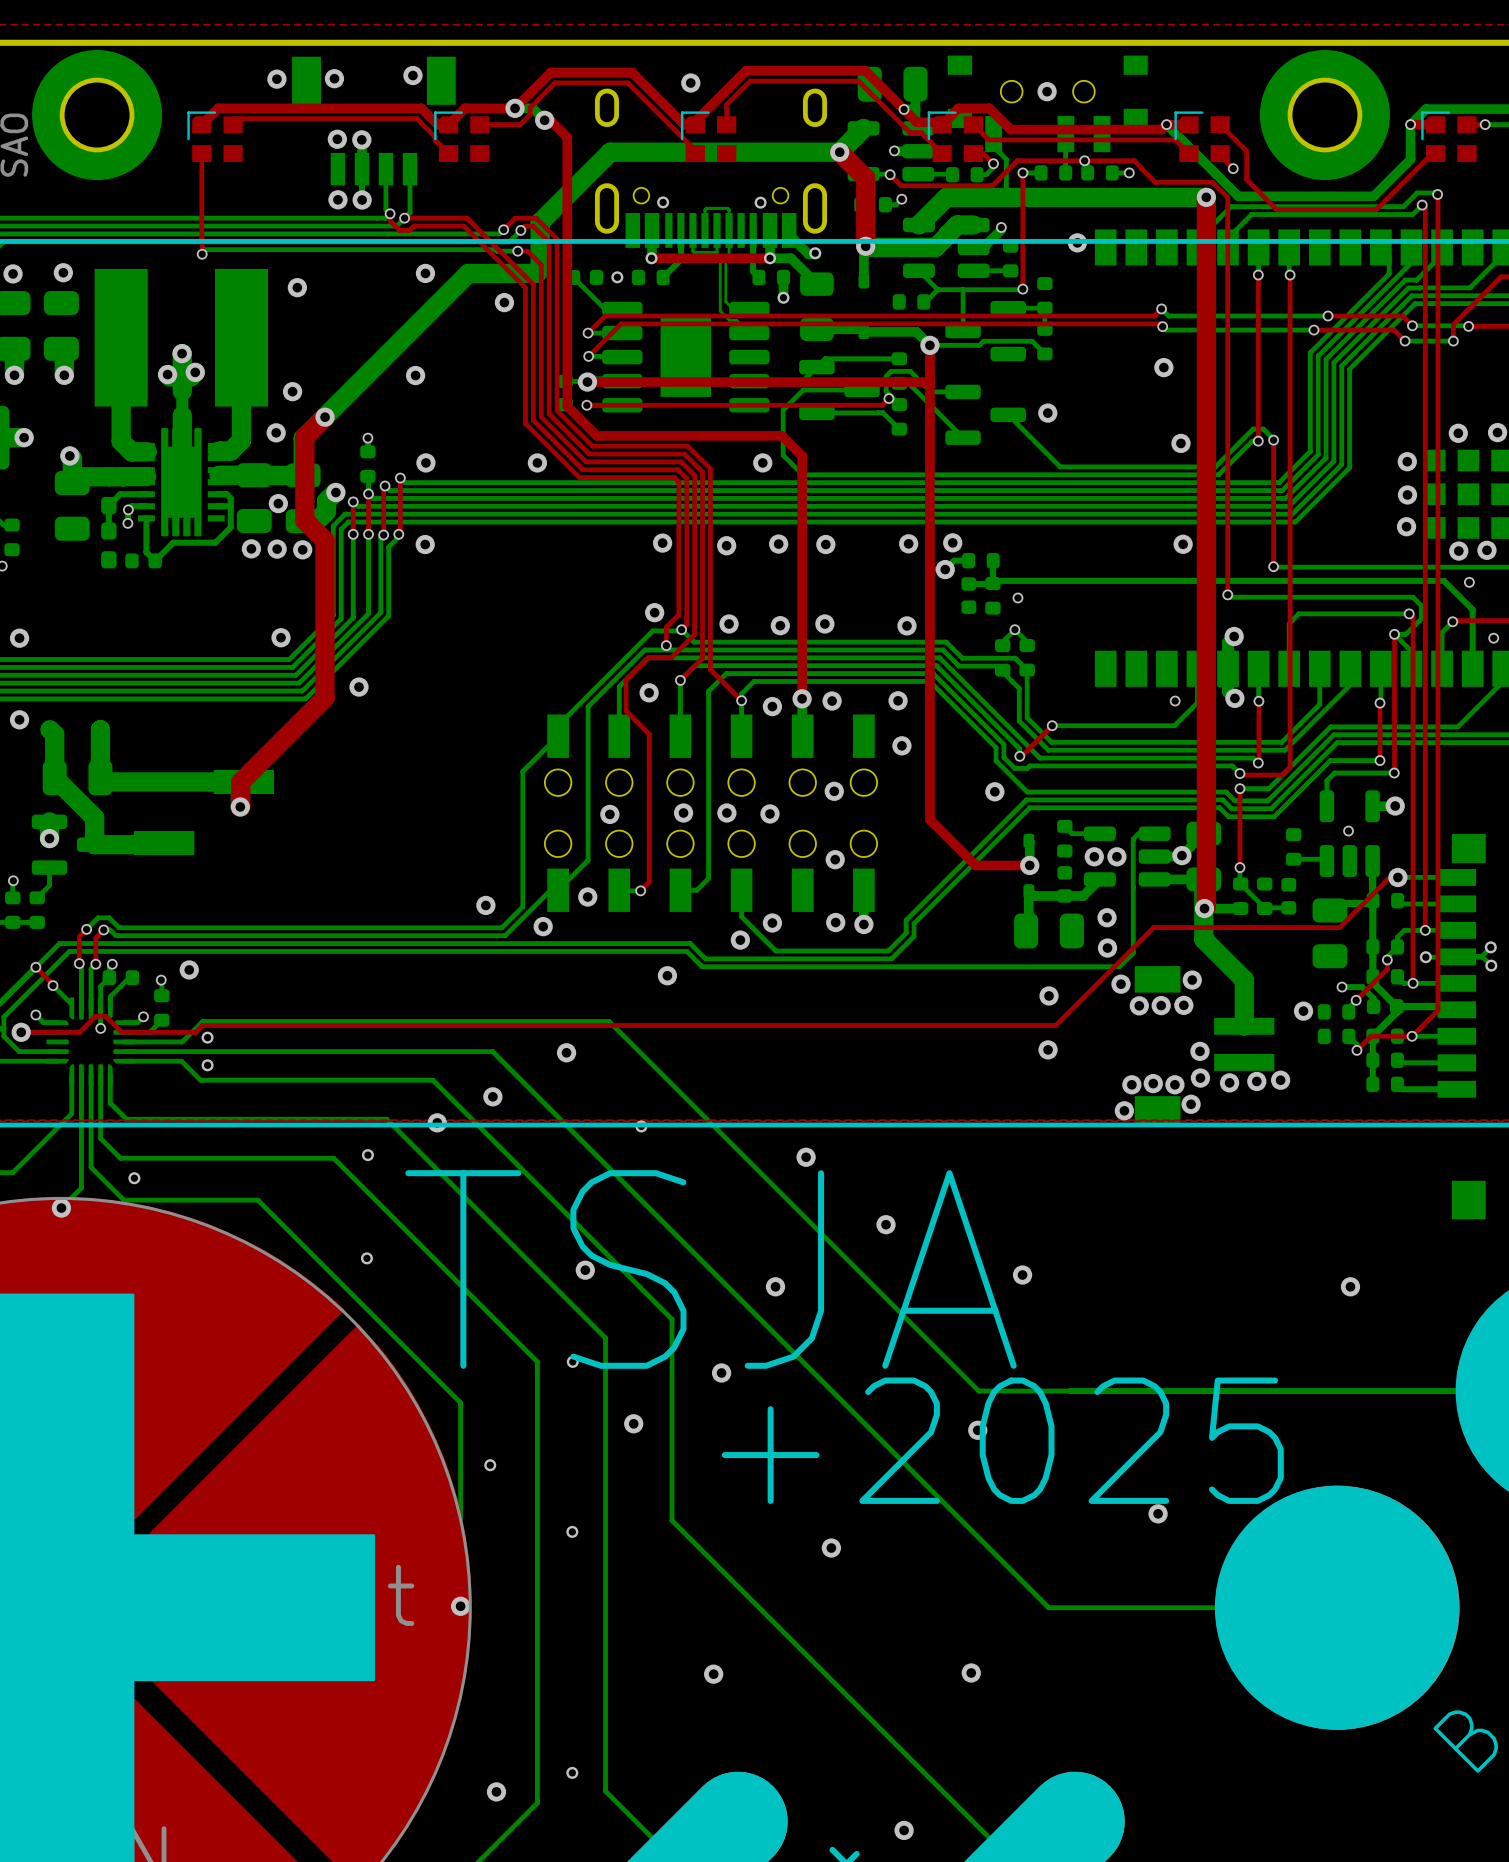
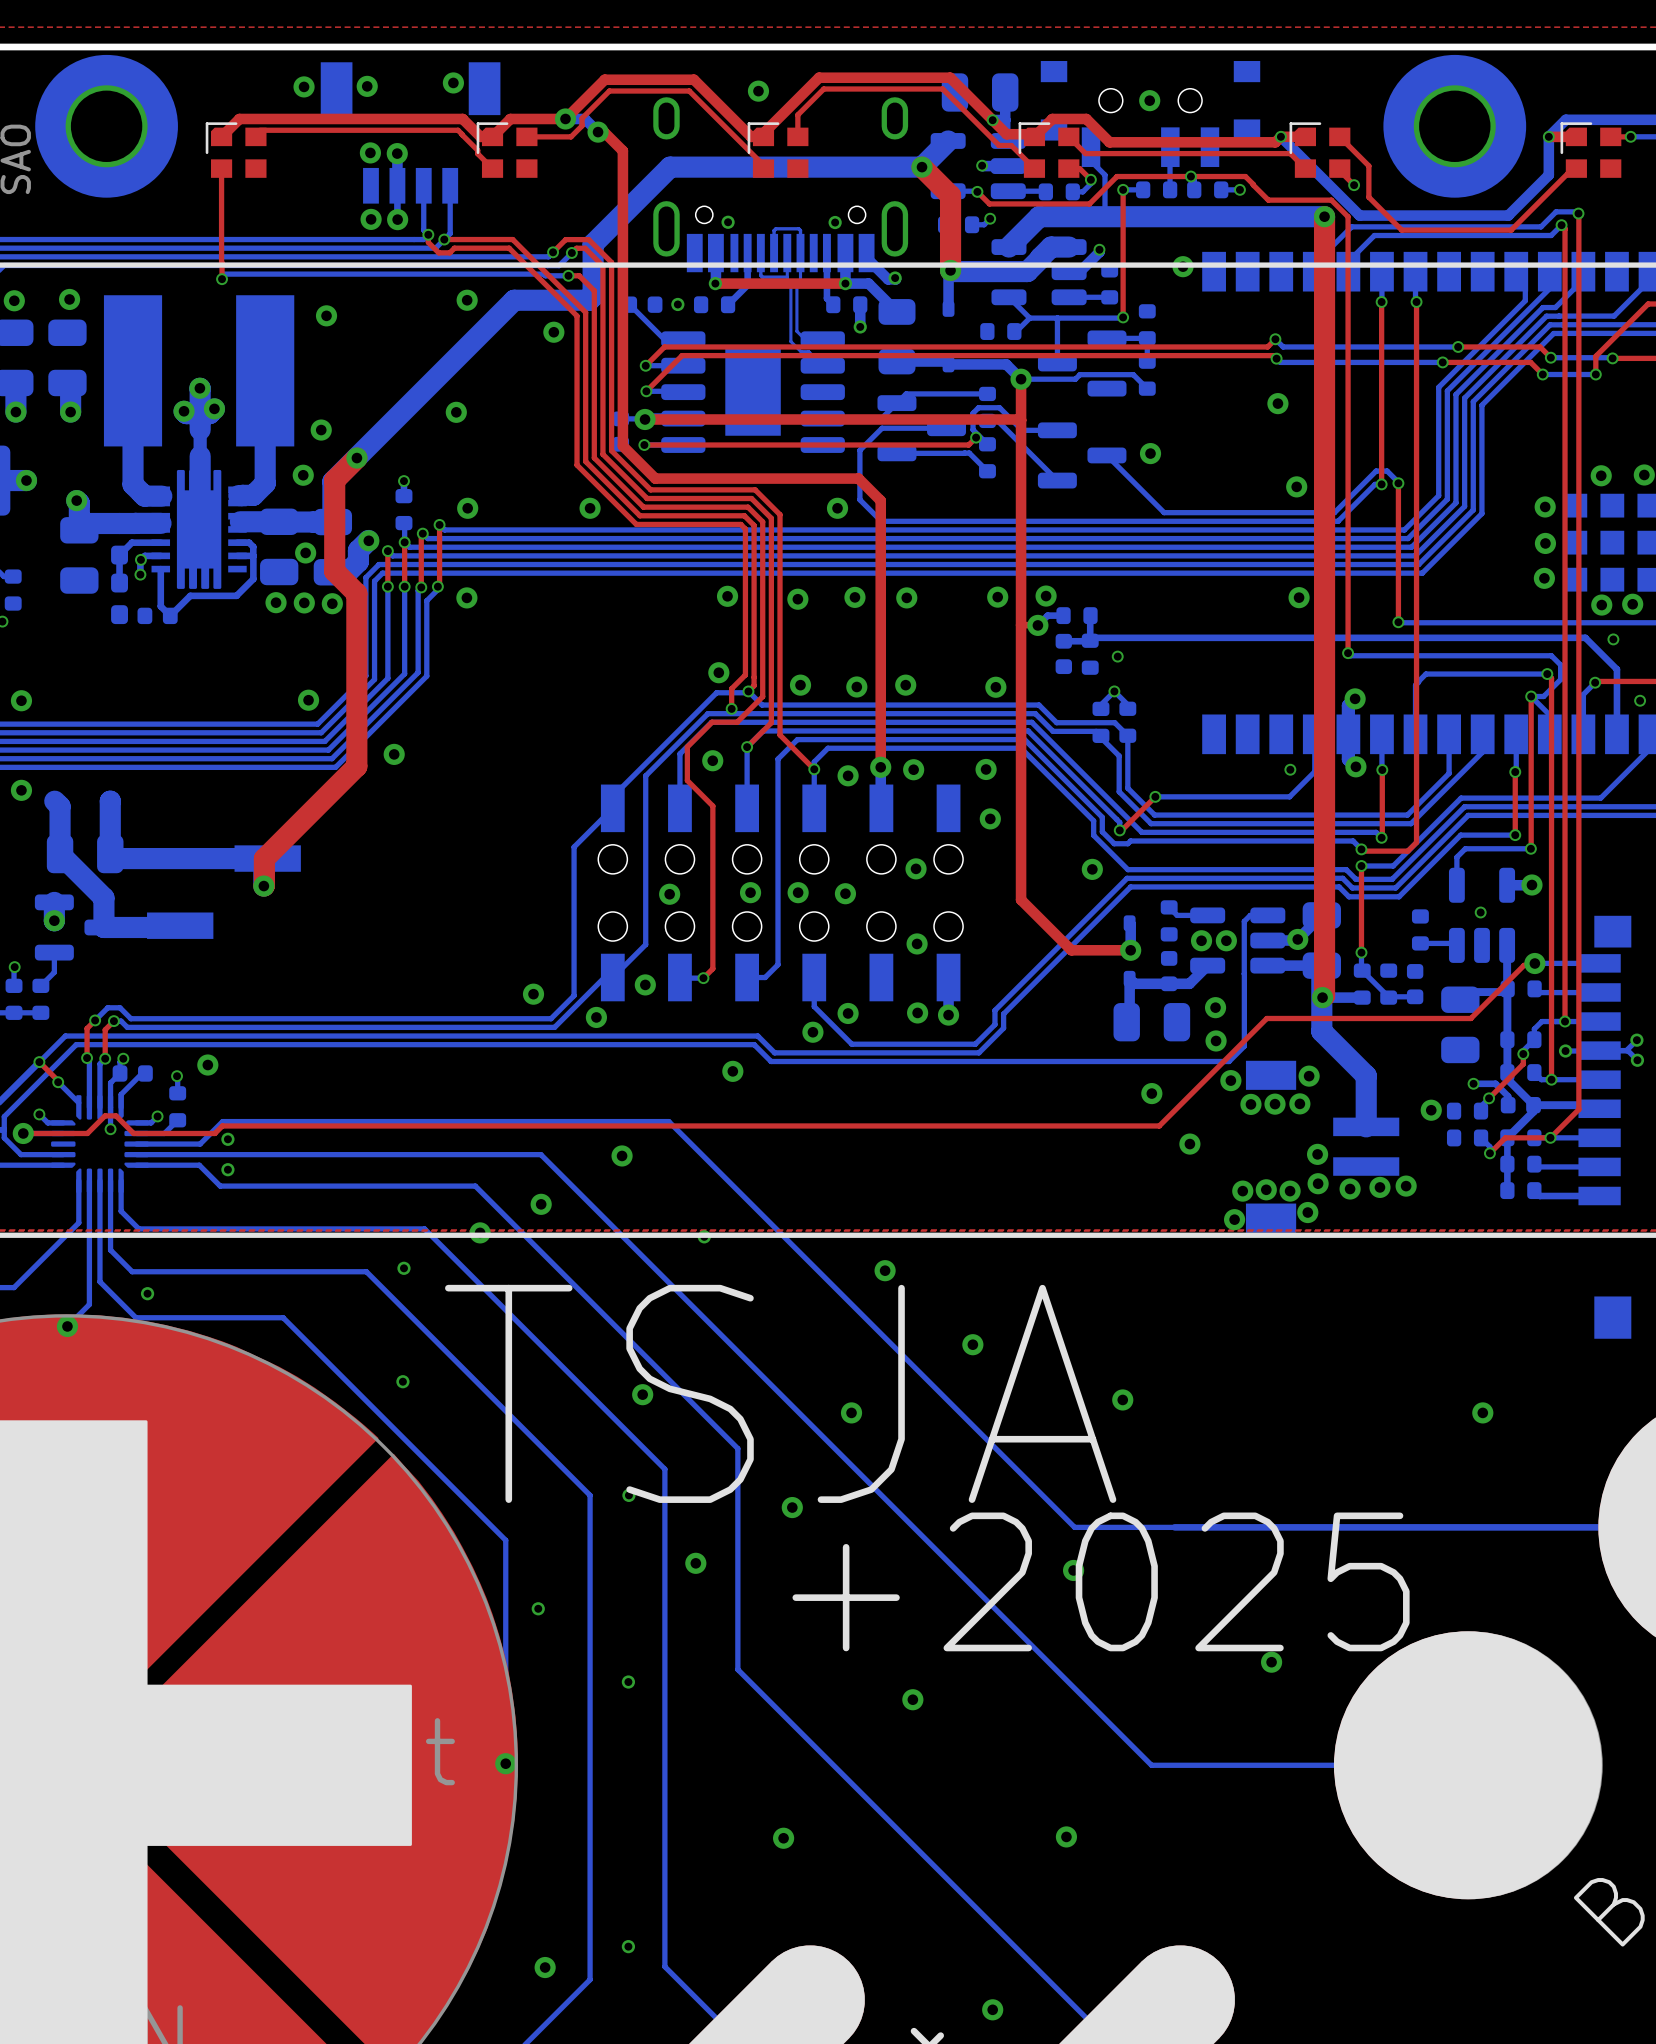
via position: (1048, 1049) -> (1189, 1144)

